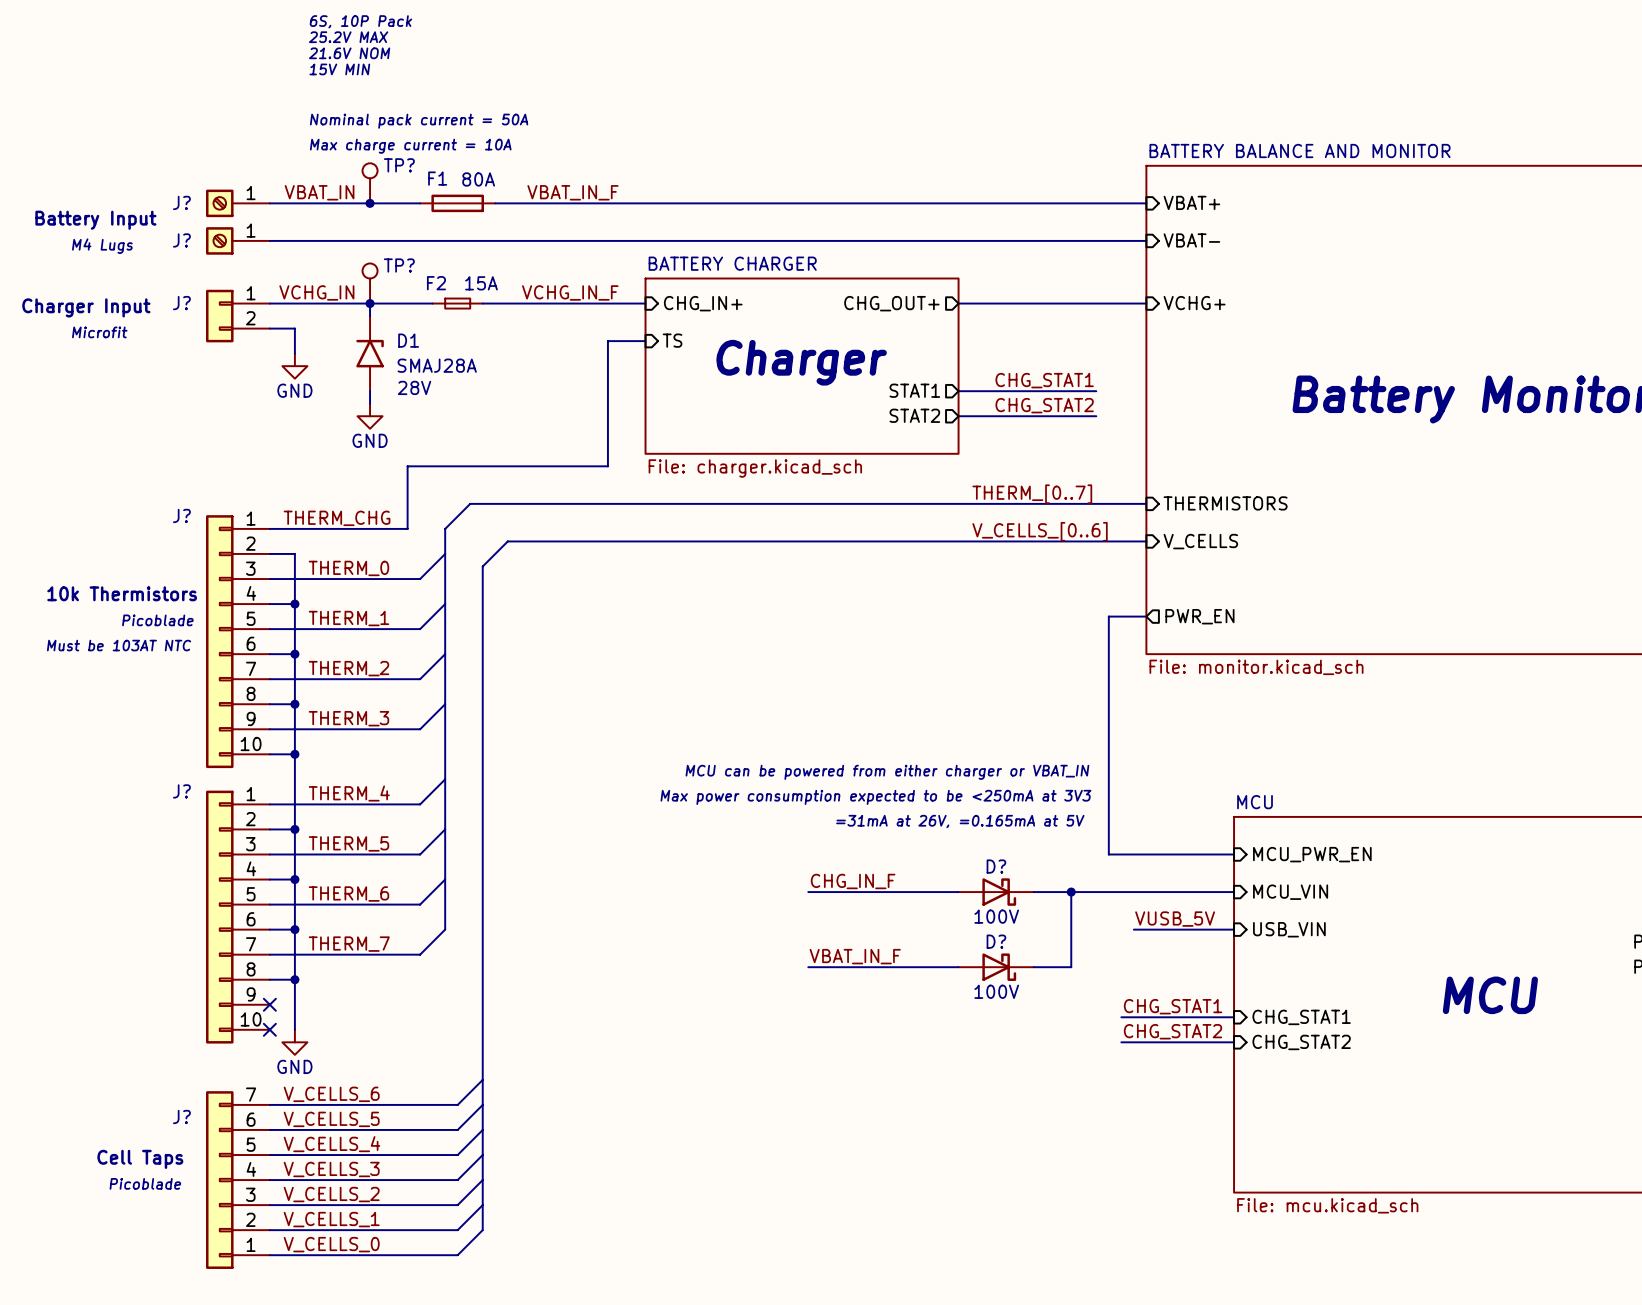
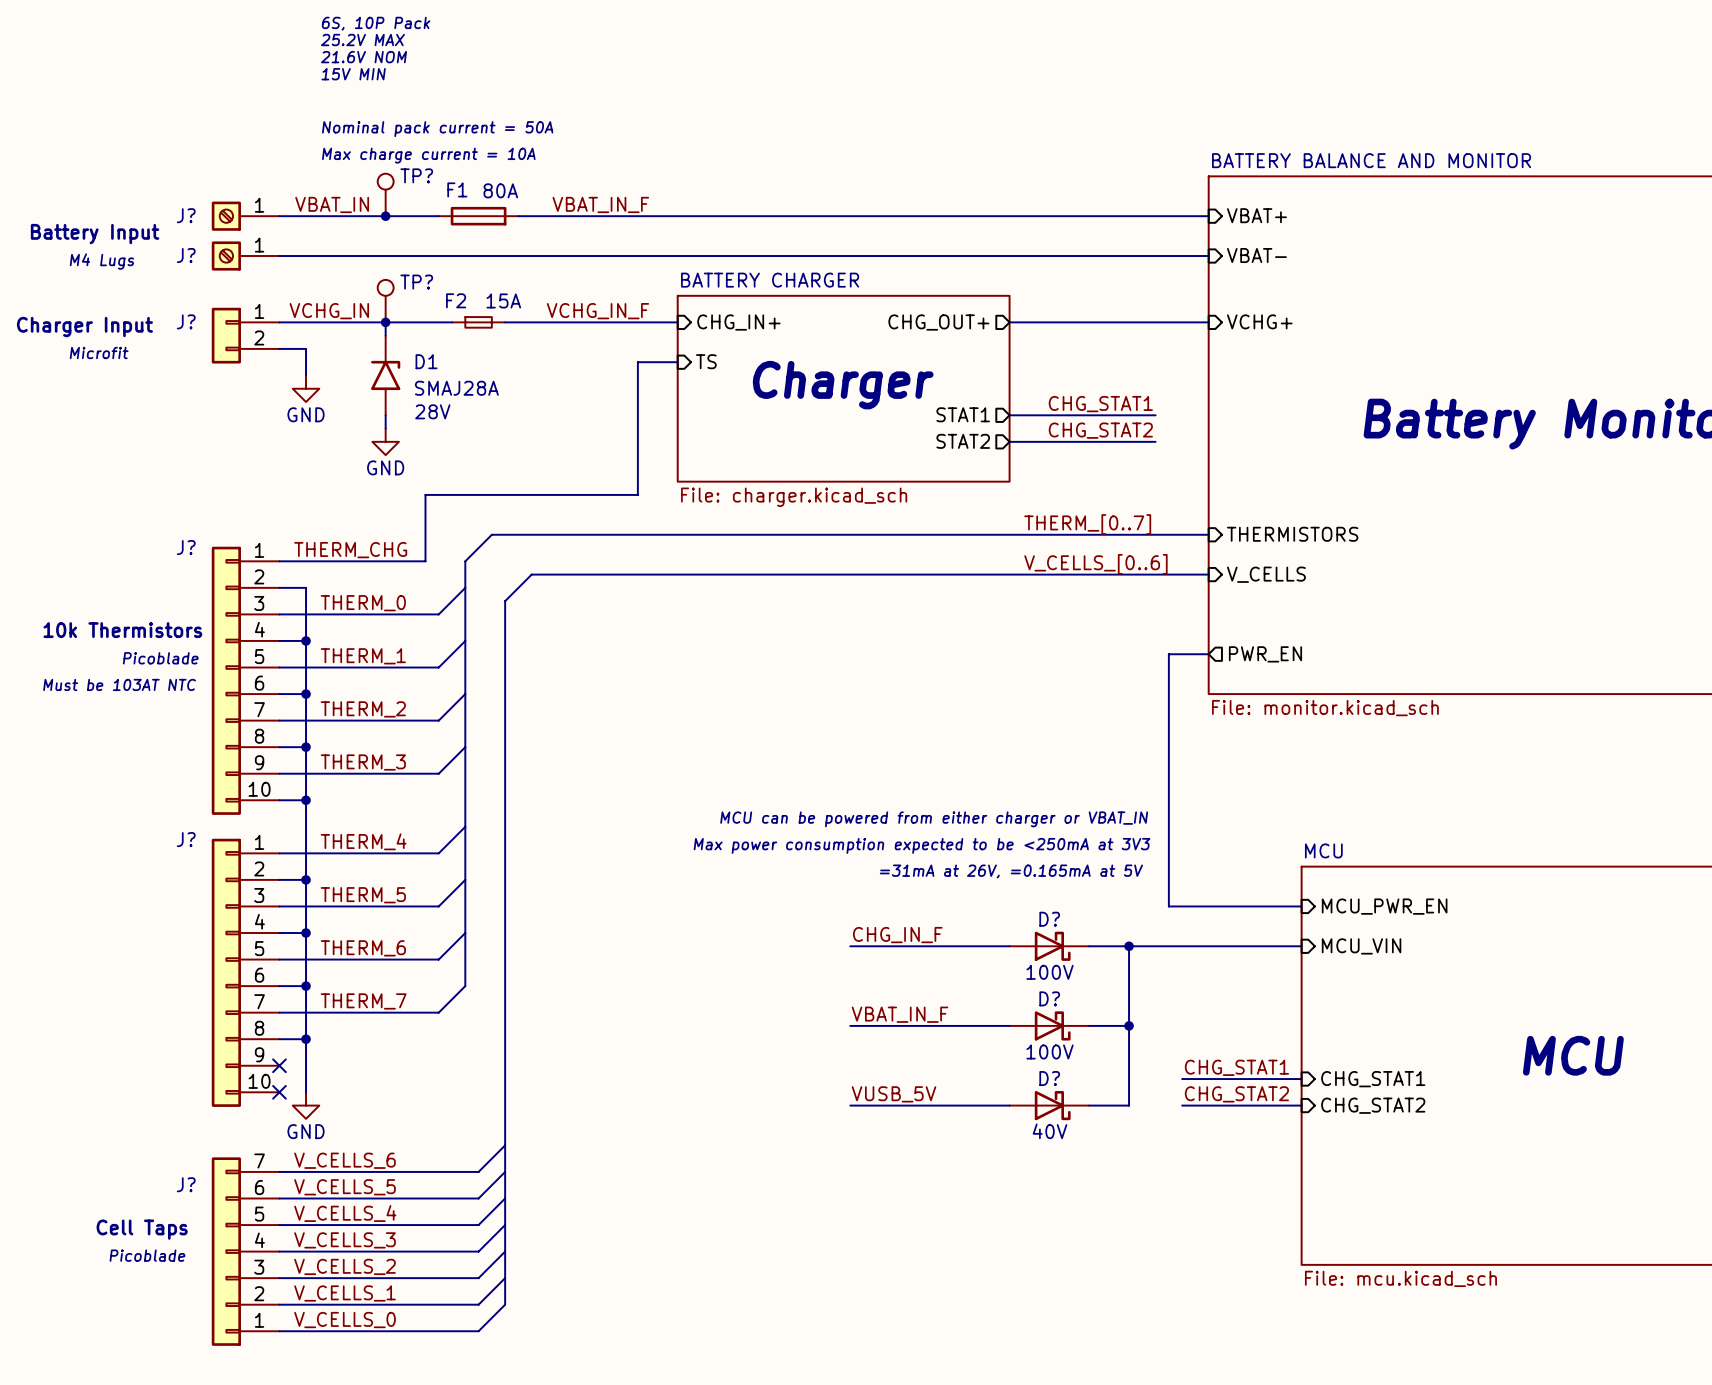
label: VUSB_5V (1175, 919) -> none
wire: (1133, 929) (1234, 929) -> none
sheet pin: USB_VIN (1289, 929) -> none
wire: none -> (1129, 1025) (1129, 1105) (1089, 1105)
junction: none -> (1129, 1025)
label: none -> VUSB_5V (893, 1094)
wire: none -> (850, 1105) (1009, 1105)
D?: none -> (1049, 1105)

